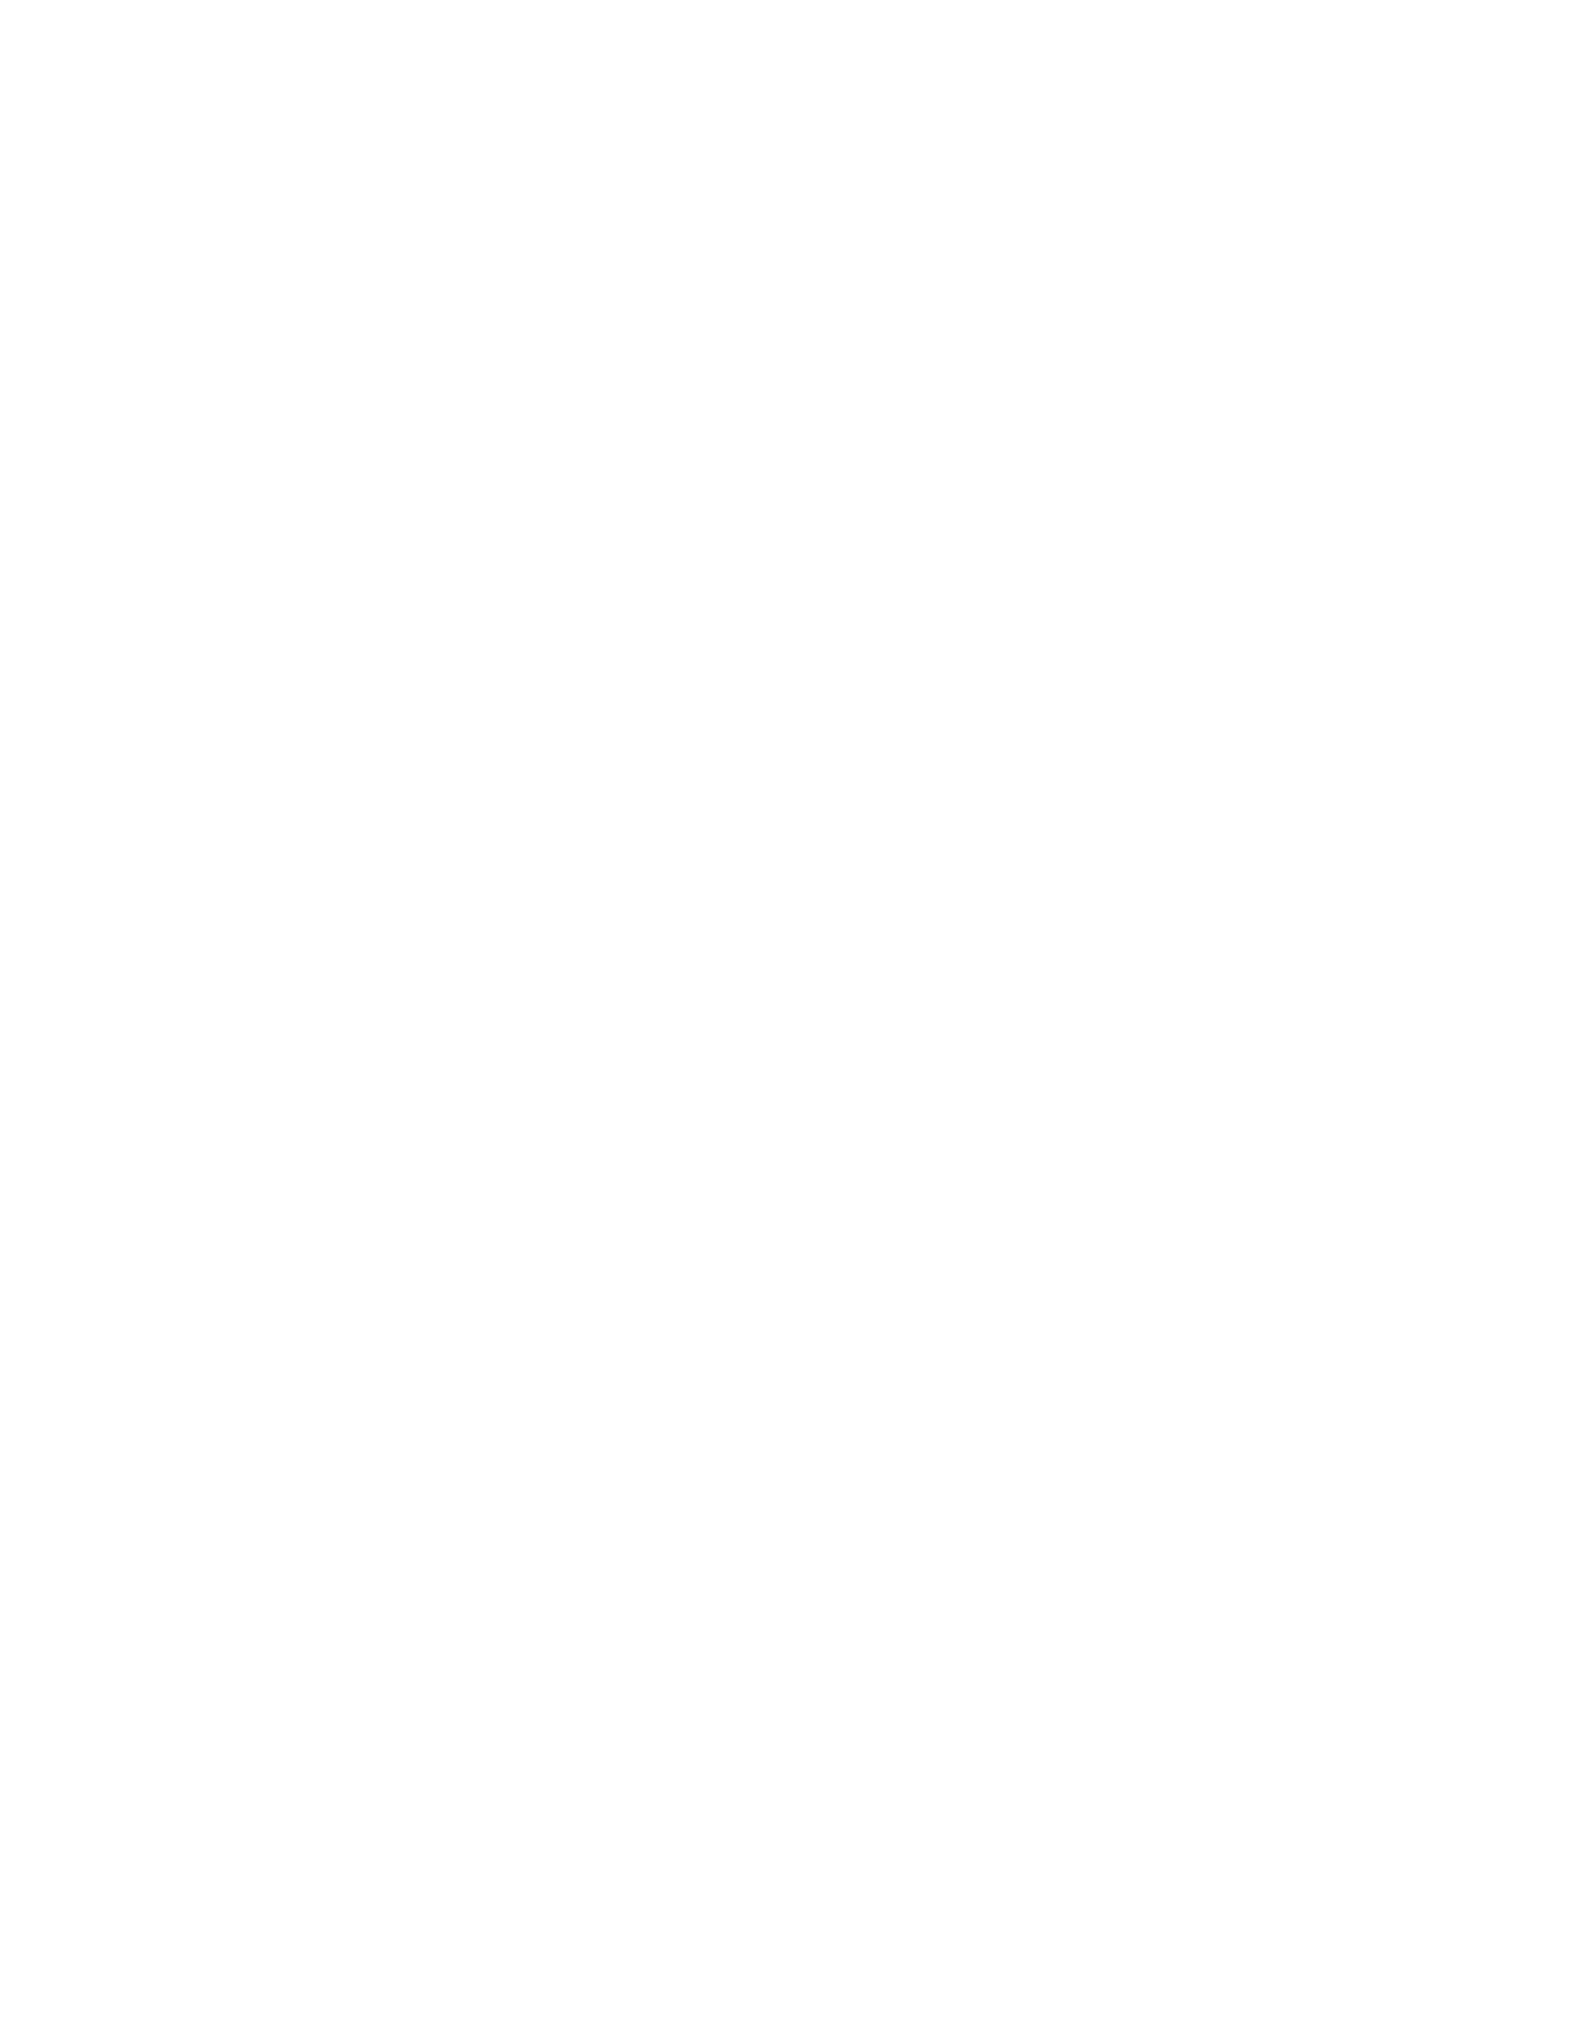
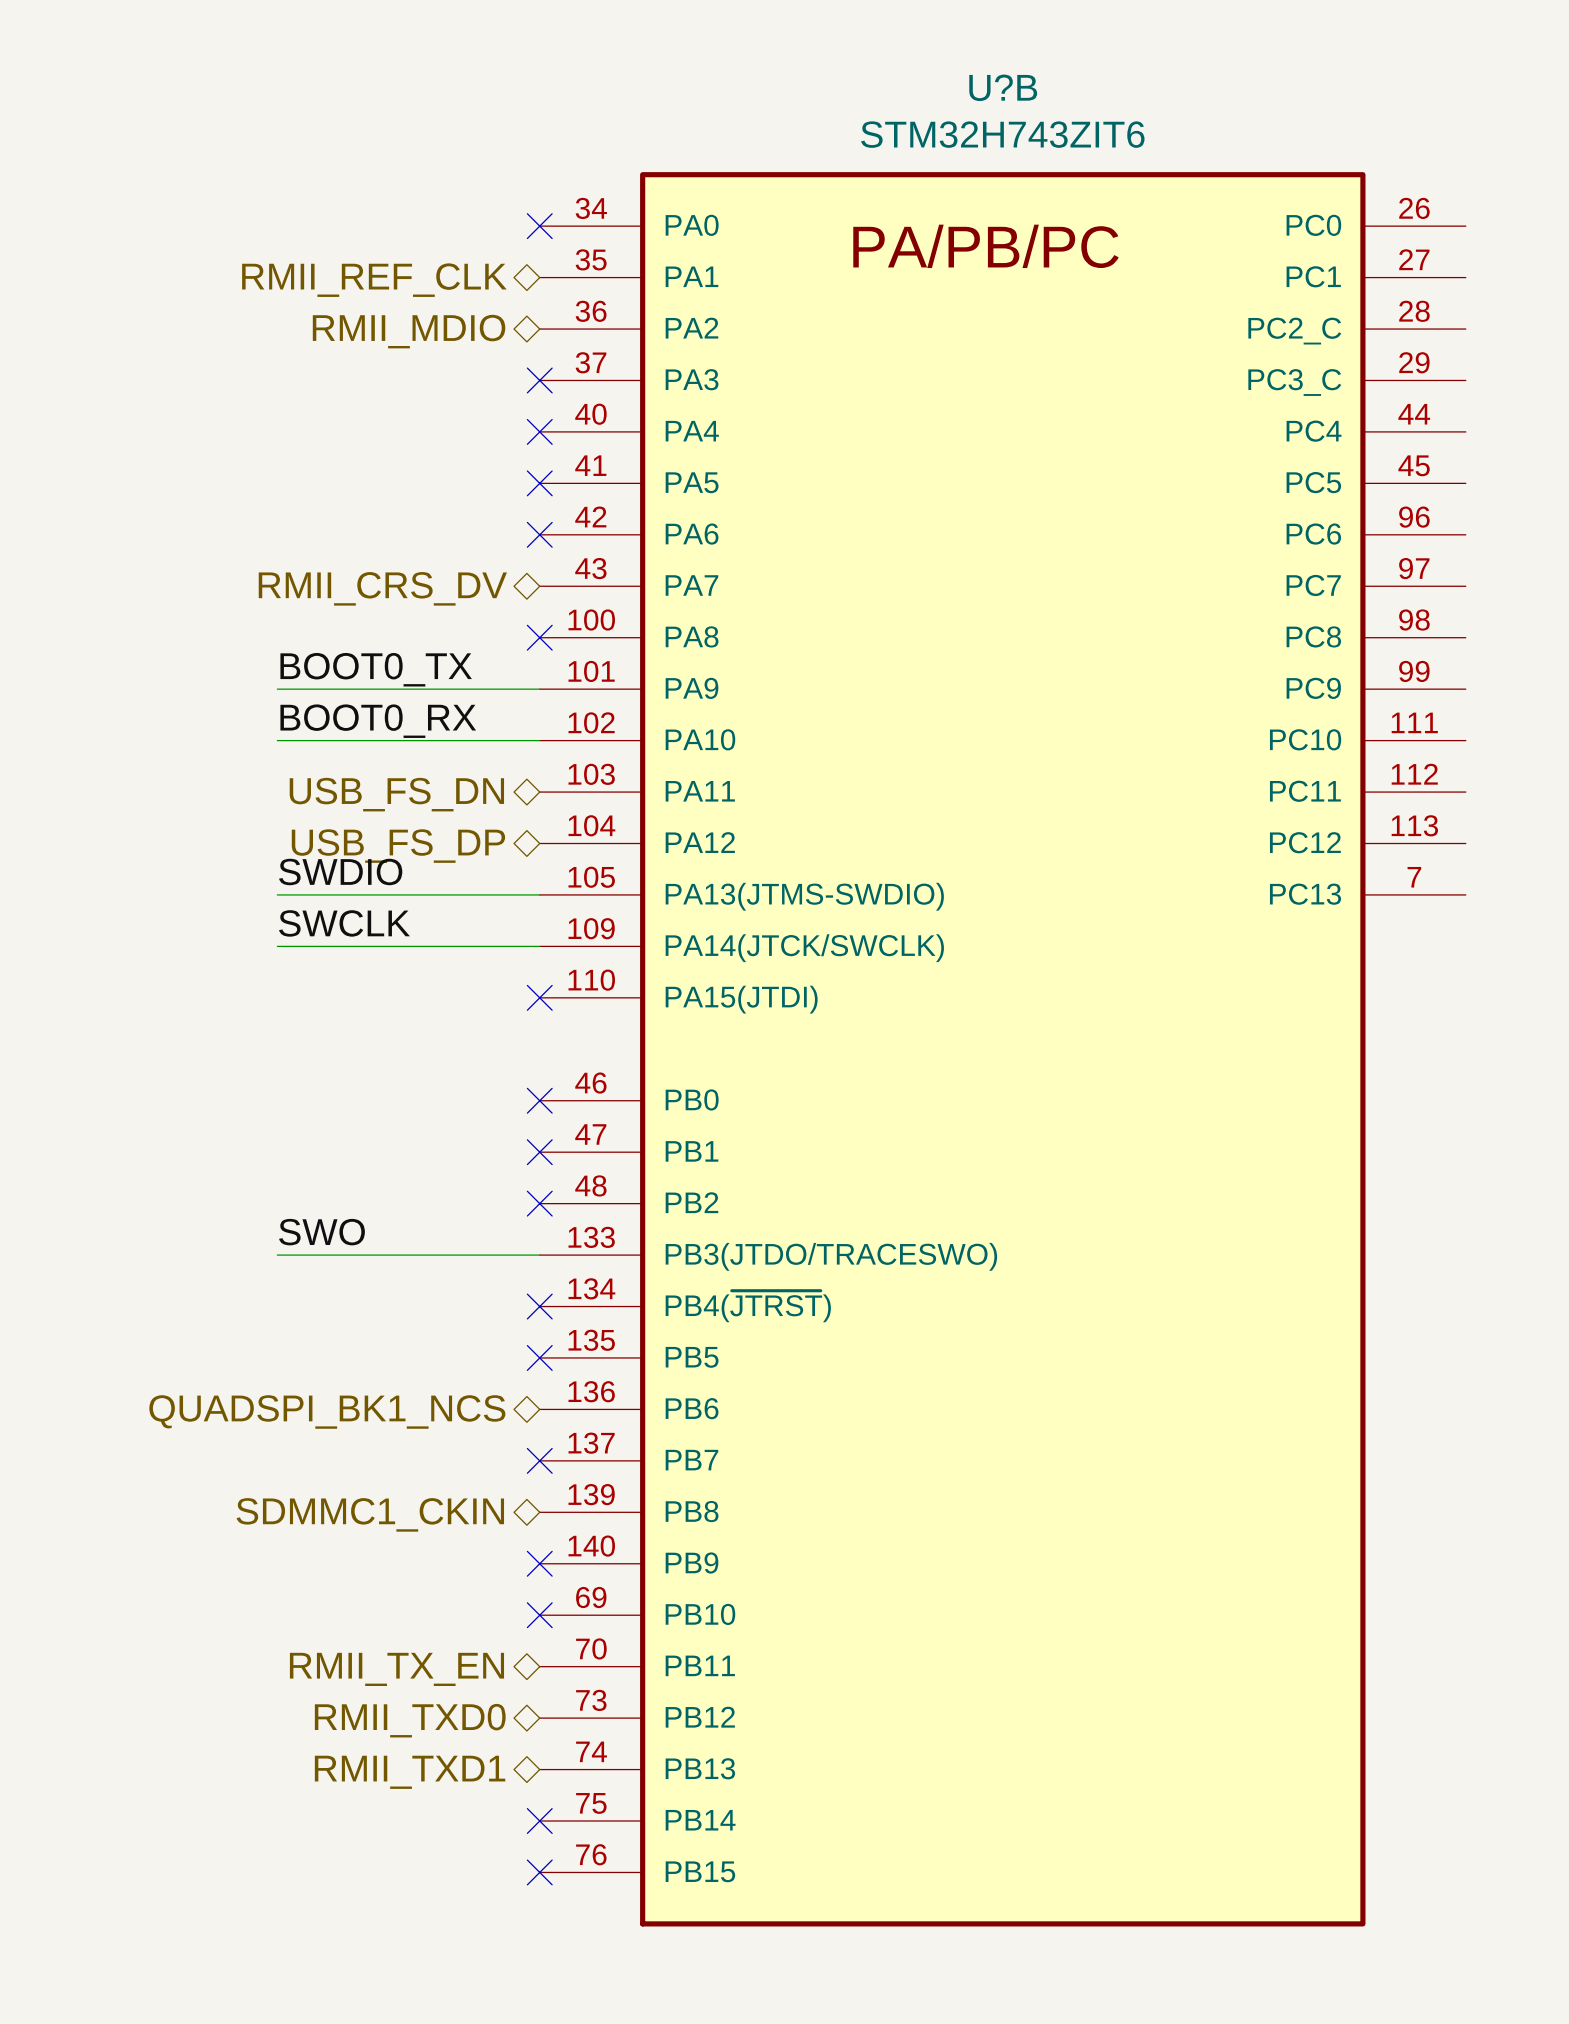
no-connect mark: none -> (539, 226)
hierarchical label: none -> RMII_REF_CLK (374, 280)
hierarchical label: none -> RMII_MDIO (409, 331)
no-connect mark: none -> (539, 380)
no-connect mark: none -> (539, 431)
no-connect mark: none -> (539, 483)
no-connect mark: none -> (539, 534)
hierarchical label: none -> RMII_CRS_DV (382, 588)
no-connect mark: none -> (539, 637)
label: none -> BOOT0_TX (376, 669)
wire: none -> (277, 689) (539, 689)
label: none -> BOOT0_RX (378, 721)
wire: none -> (277, 740) (539, 740)
hierarchical label: none -> USB_FS_DN (396, 794)
hierarchical label: none -> USB_FS_DP (398, 846)
label: none -> SWDIO (340, 871)
wire: none -> (277, 894) (539, 894)
label: none -> SWCLK (344, 923)
wire: none -> (277, 946) (539, 946)
no-connect mark: none -> (539, 997)
U?B: none -> STM32H743ZIT6 (1002, 1049)
no-connect mark: none -> (539, 1100)
no-connect mark: none -> (539, 1152)
no-connect mark: none -> (539, 1203)
label: none -> SWO (321, 1232)
wire: none -> (277, 1255) (539, 1255)
no-connect mark: none -> (539, 1306)
no-connect mark: none -> (539, 1357)
hierarchical label: none -> QUADSPI_BK1_NCS (327, 1411)
no-connect mark: none -> (539, 1460)
hierarchical label: none -> SDMMC1_CKIN (370, 1514)
no-connect mark: none -> (539, 1563)
no-connect mark: none -> (539, 1615)
hierarchical label: none -> RMII_TX_EN (396, 1669)
hierarchical label: none -> RMII_TXD0 (410, 1720)
hierarchical label: none -> RMII_TXD1 (410, 1772)
no-connect mark: none -> (539, 1821)
no-connect mark: none -> (539, 1872)

